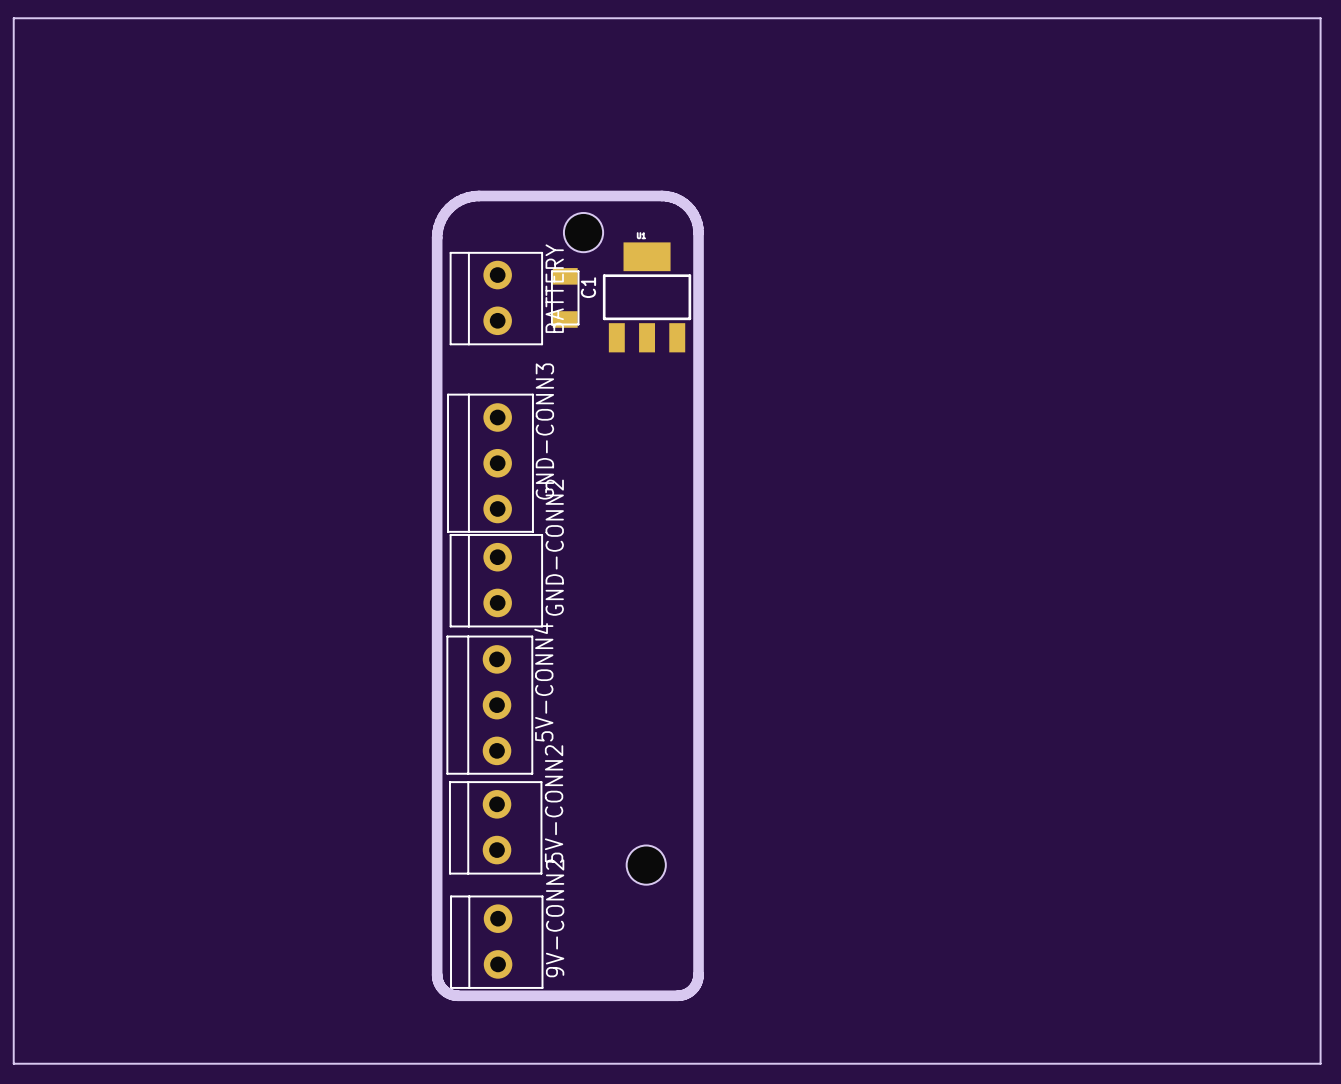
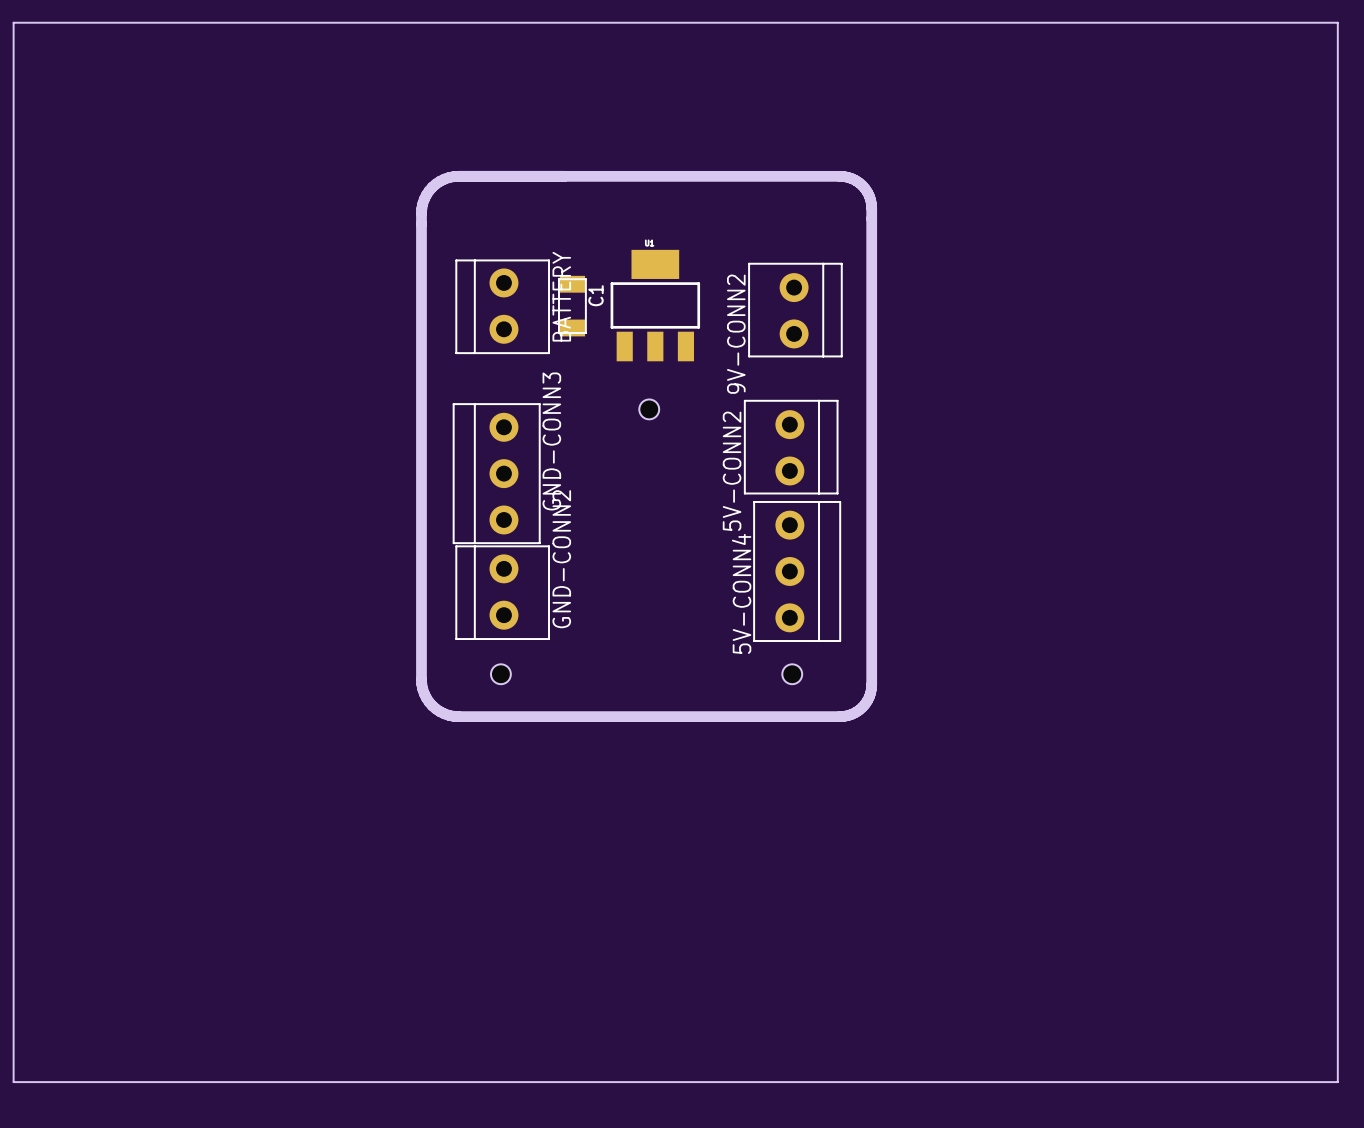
board edge: none -> (458, 176) (839, 176) (855, 180) (865, 188) (870, 199) (871, 208) (871, 684) (867, 700) (859, 710) (848, 715) (839, 716) (458, 716) (440, 711) (429, 702) (424, 693) (421, 679) (421, 213) (424, 199) (432, 187) (444, 179) (458, 176)
board edge: (478, 195) (462, 199) (449, 208) (440, 221) (437, 237) (437, 980) (445, 991) (458, 995) (683, 995) (694, 987) (698, 974) (697, 223) (687, 206) (675, 198) (666, 196) (478, 195) -> none
hole: (583, 232) -> none
hole: none -> (649, 409)
hole: none -> (500, 674)
hole: none -> (792, 674)
5V-CONN4 rotation: 0° (489, 705) -> 180° (797, 571)
5V-CONN4 position: (489, 705) -> (797, 571)
5V-CONN2 rotation: 0° (495, 827) -> 180° (791, 447)
5V-CONN2 position: (495, 827) -> (791, 447)
hole: (646, 865) -> none
9V-CONN2 rotation: 0° (496, 942) -> 180° (795, 310)
9V-CONN2 position: (496, 942) -> (795, 310)

